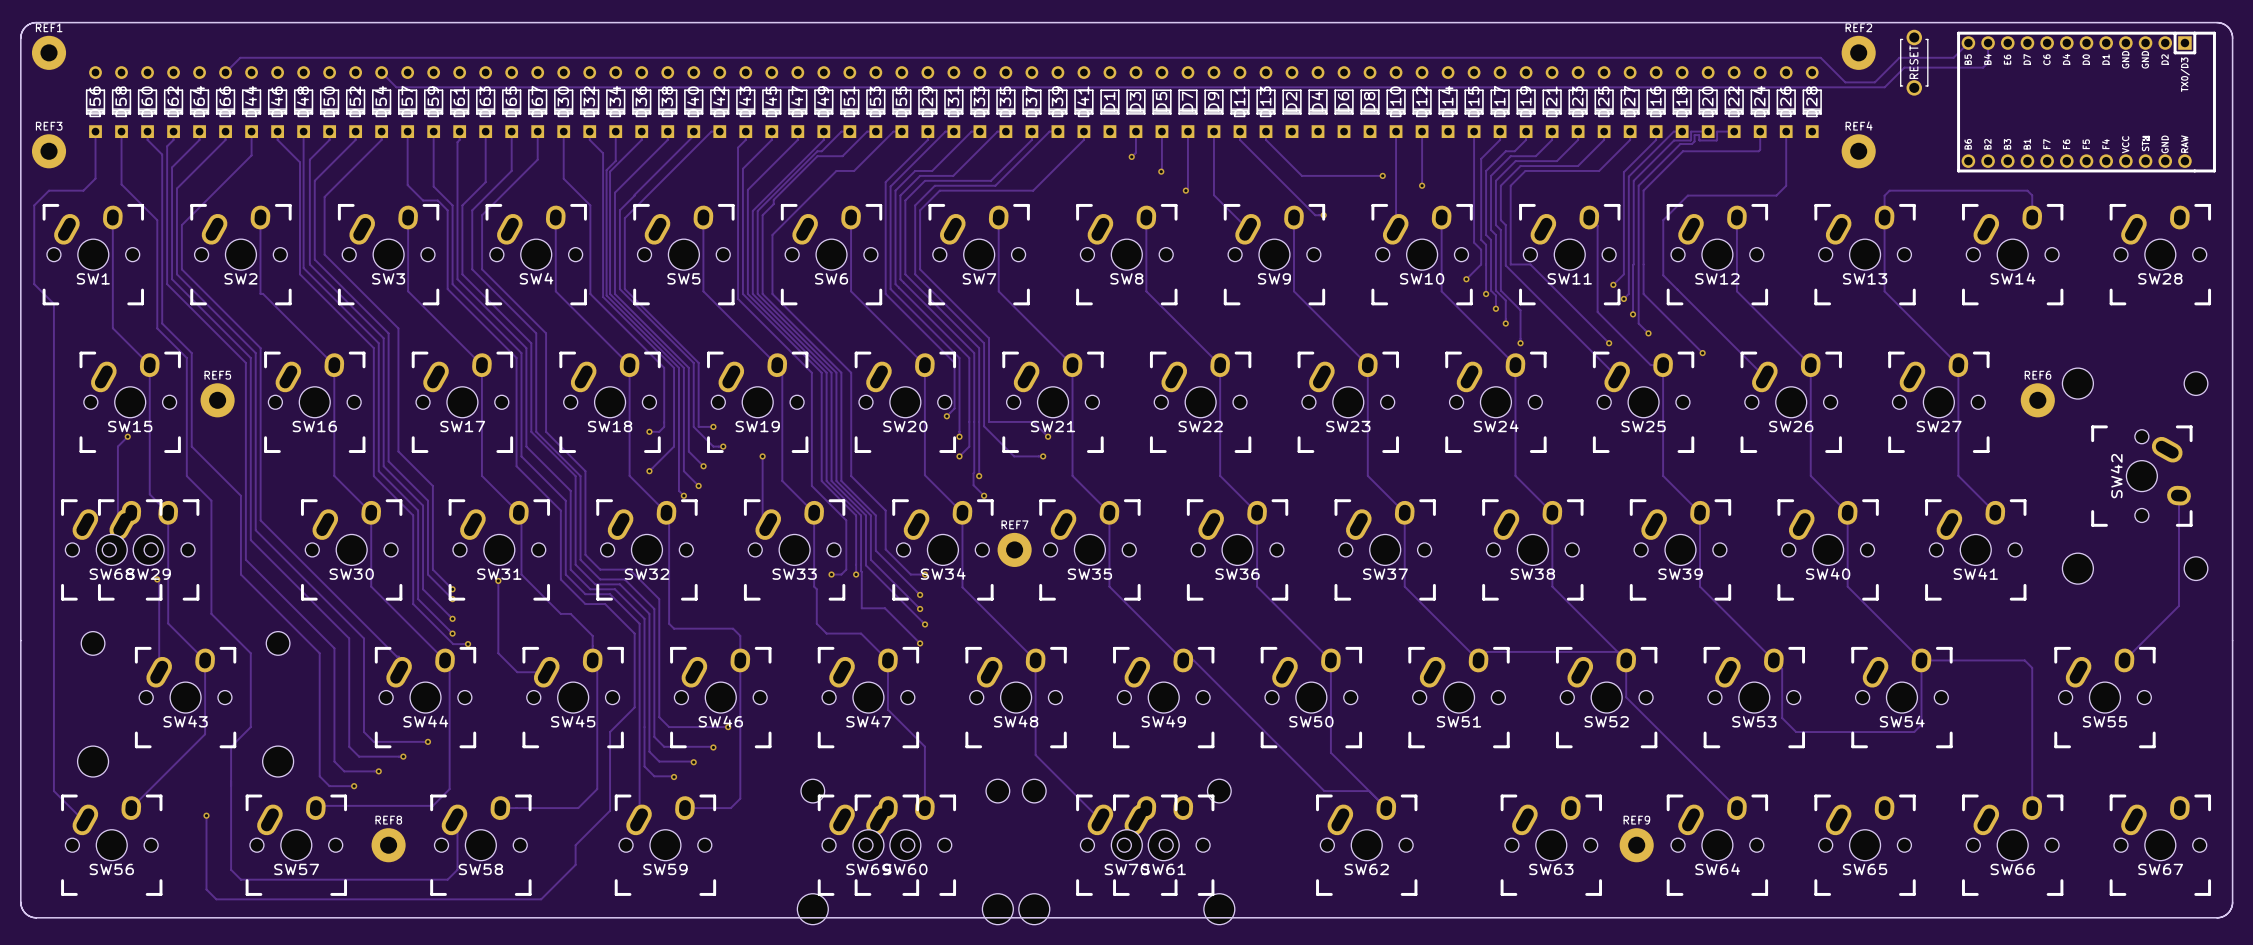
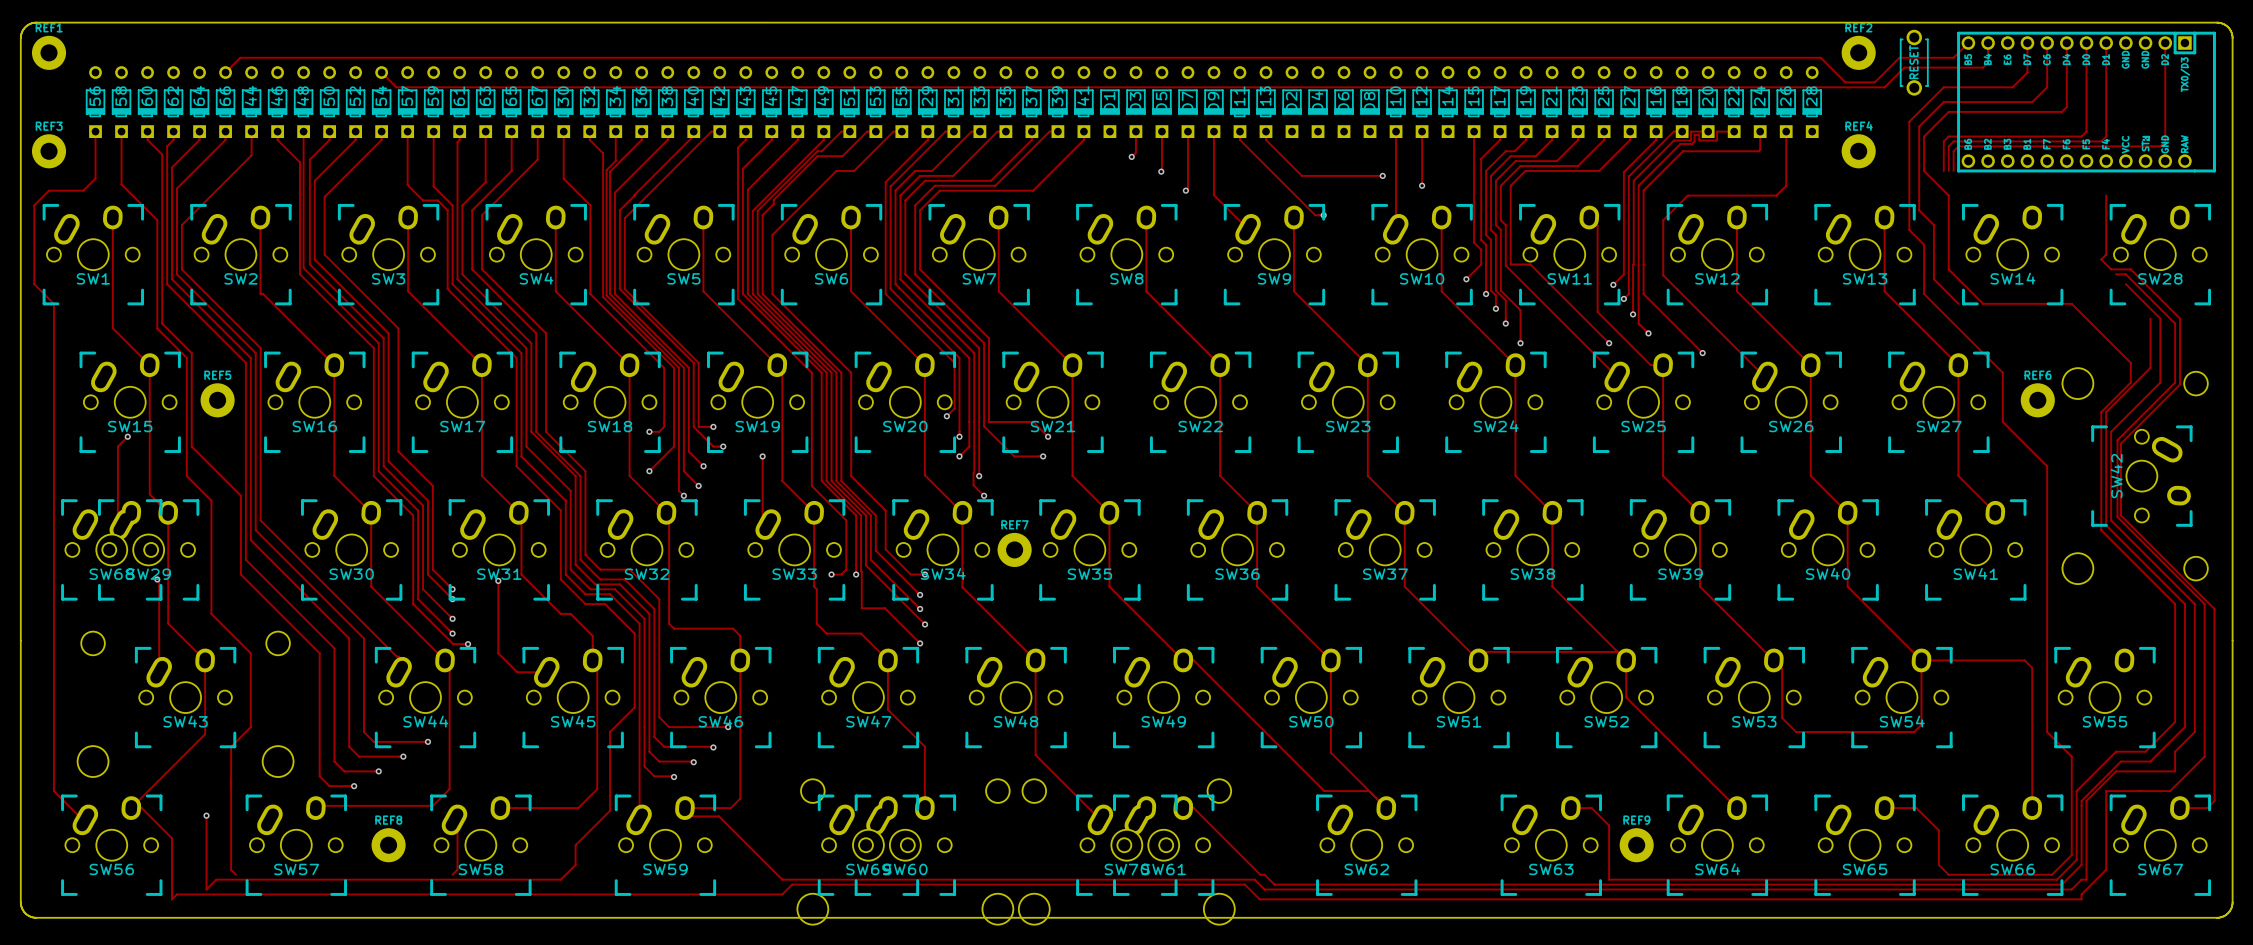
track: none -> (2027, 43) (2027, 72) (2012, 87) (1943, 87) (1909, 121) (1909, 230) (1924, 244) (1924, 294) (2002, 372) (2002, 421) (2047, 466) (2047, 732) (2071, 756) (2071, 855) (2052, 874) (1948, 874) (1938, 864) (1938, 830) (1916, 808) (1884, 808)
track: none -> (2047, 43) (2047, 87) (2032, 102) (1943, 102) (1919, 126) (1919, 210) (1933, 225) (1933, 279) (1958, 303)
track: none -> (2066, 43) (2066, 106) (2061, 111) (1948, 111) (1924, 136) (1924, 170) (1948, 195) (1948, 269) (1983, 303) (2071, 303) (2130, 362) (2130, 382) (2101, 412) (2101, 530) (2175, 604) (2175, 722) (2145, 751) (2116, 751) (2076, 791) (2076, 859) (2056, 879) (1609, 879) (1609, 825) (1591, 808) (1570, 808)
track: none -> (2086, 43) (2086, 131) (2081, 136) (1948, 136) (1943, 141) (1943, 170)
track: none -> (2106, 43) (2106, 136) (2101, 141) (1953, 141) (1948, 146) (1948, 170)
track: none -> (2165, 43) (2165, 141) (2160, 146) (1958, 146) (1953, 151) (1953, 170)
track: none -> (2106, 195) (2106, 254) (2101, 259) (2111, 269) (2130, 269) (2180, 318) (2180, 384) (2120, 443) (2120, 515) (2214, 608) (2214, 800) (2207, 808) (2179, 808)
track: (1884, 217) (1884, 195) (1889, 190) (2027, 190) (2032, 195) (2032, 217) -> none
track: none -> (2116, 274) (2125, 274) (2175, 323) (2175, 382) (2117, 440) (2117, 516) (2204, 604) (2204, 756) (2170, 791) (2106, 791) (2106, 869) (2081, 894) (2081, 899) (1259, 899) (1244, 884) (792, 884) (782, 894) (176, 894) (172, 899) (172, 838) (141, 808) (131, 808)
track: none -> (2125, 284) (2160, 318) (2160, 382) (2111, 431) (2111, 520) (2194, 604) (2194, 732) (2175, 751) (2175, 771) (2116, 771) (2086, 800) (2086, 879) (2081, 879) (2071, 889) (1264, 889) (1254, 879) (782, 879) (719, 816) (693, 816) (684, 808)
track: none -> (2150, 318) (2150, 367) (2106, 412) (2106, 525) (2184, 604) (2184, 727) (2150, 761) (2120, 761) (2081, 800) (2081, 864) (2061, 884) (1274, 884) (1264, 874) (1260, 874) (1193, 808) (1183, 808)
track: (2179, 495) (2179, 605) (2124, 660) -> none
track: (236, 874) (240, 879) -> (206, 889) (216, 879) (240, 879)
track: (452, 874) (447, 879) -> (560, 879) (447, 879)
track: (560, 879) (541, 899) (216, 899) (206, 889) -> none

